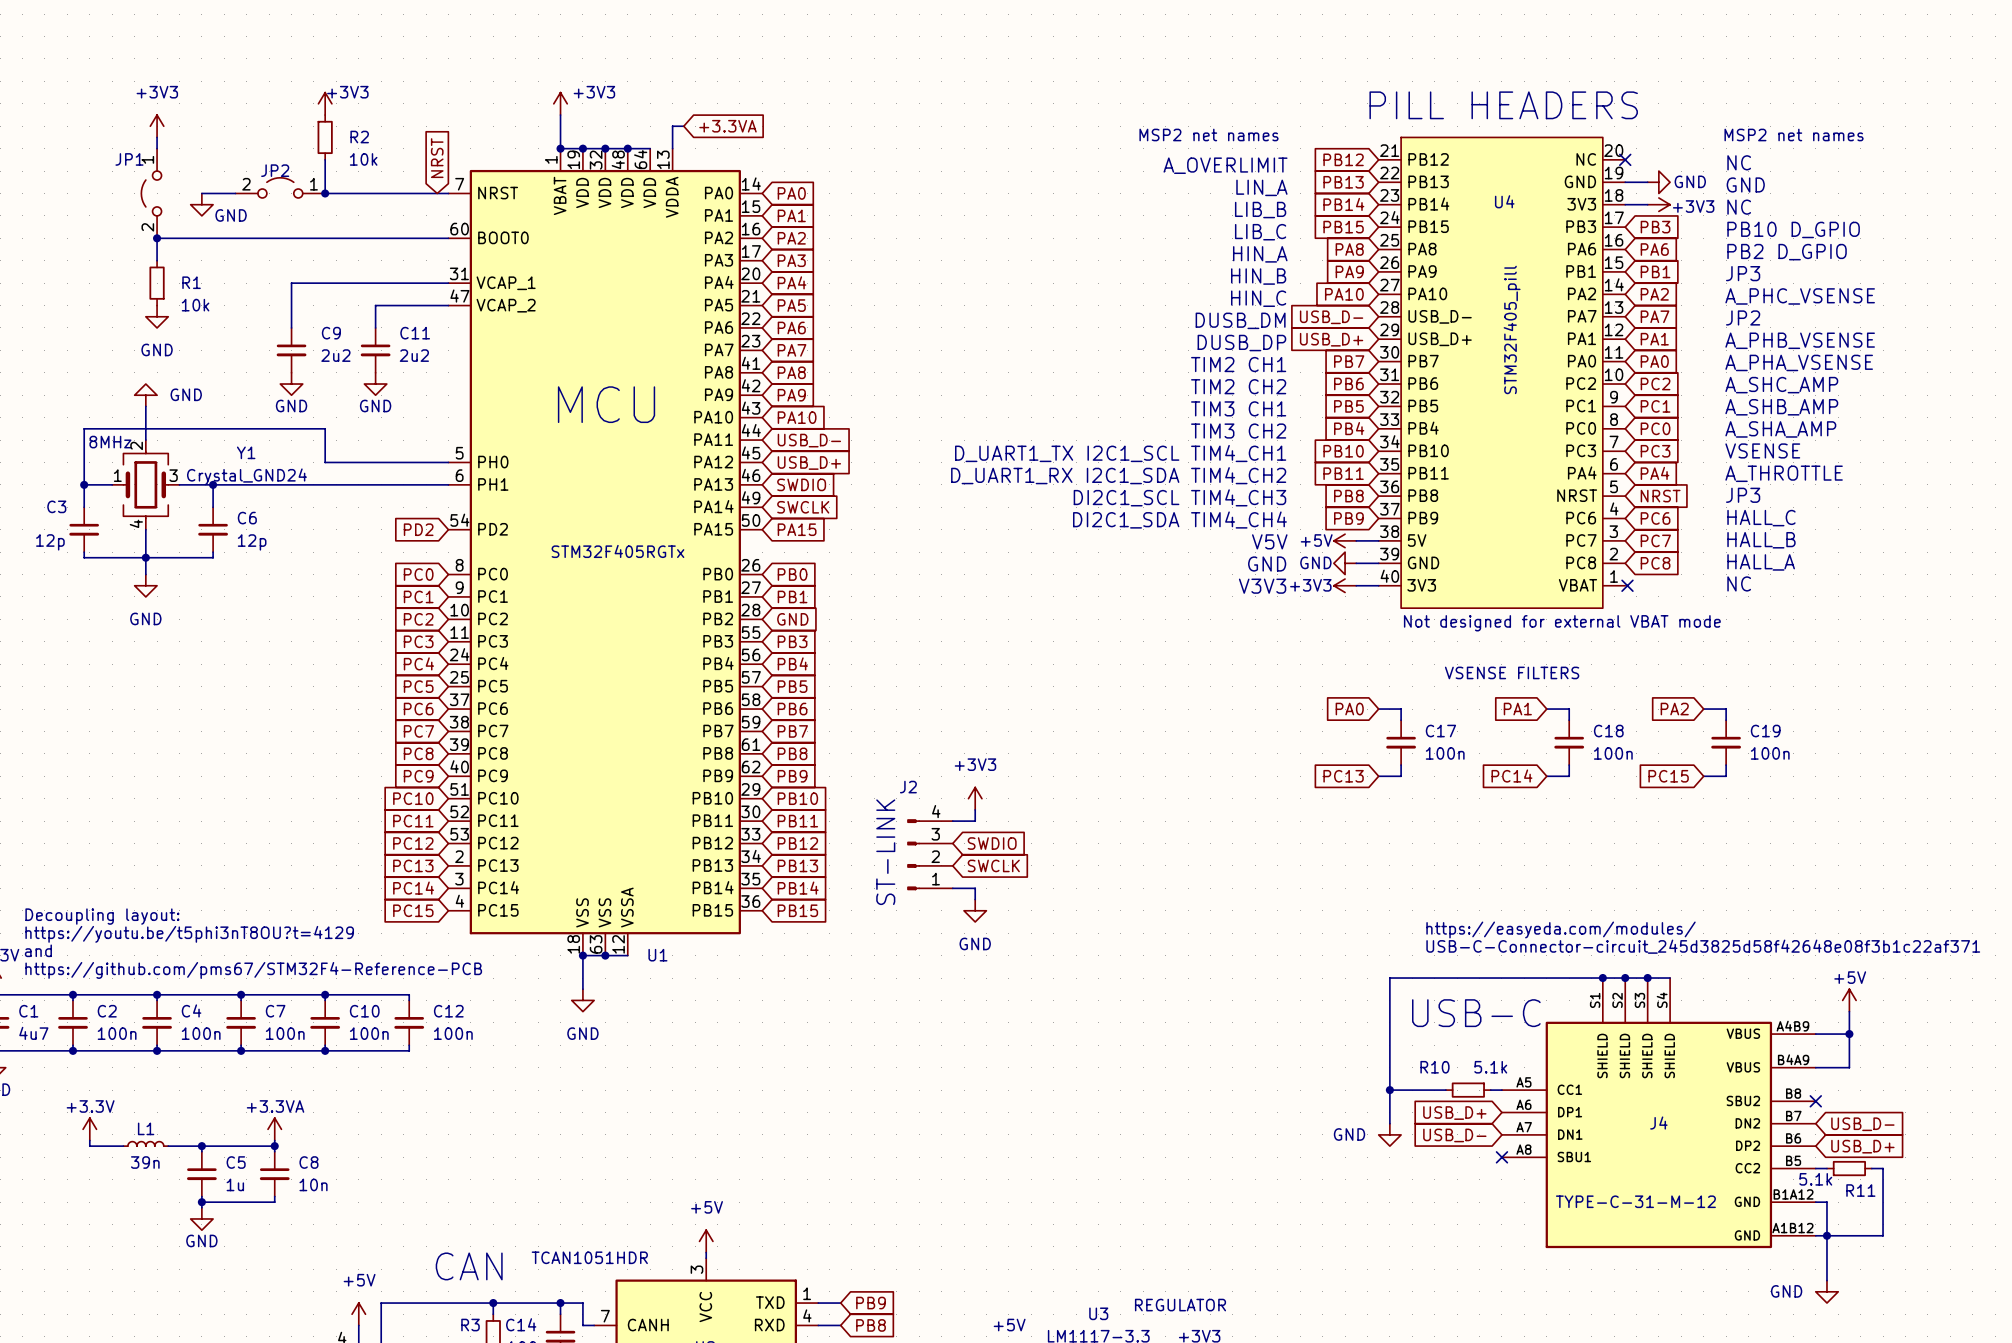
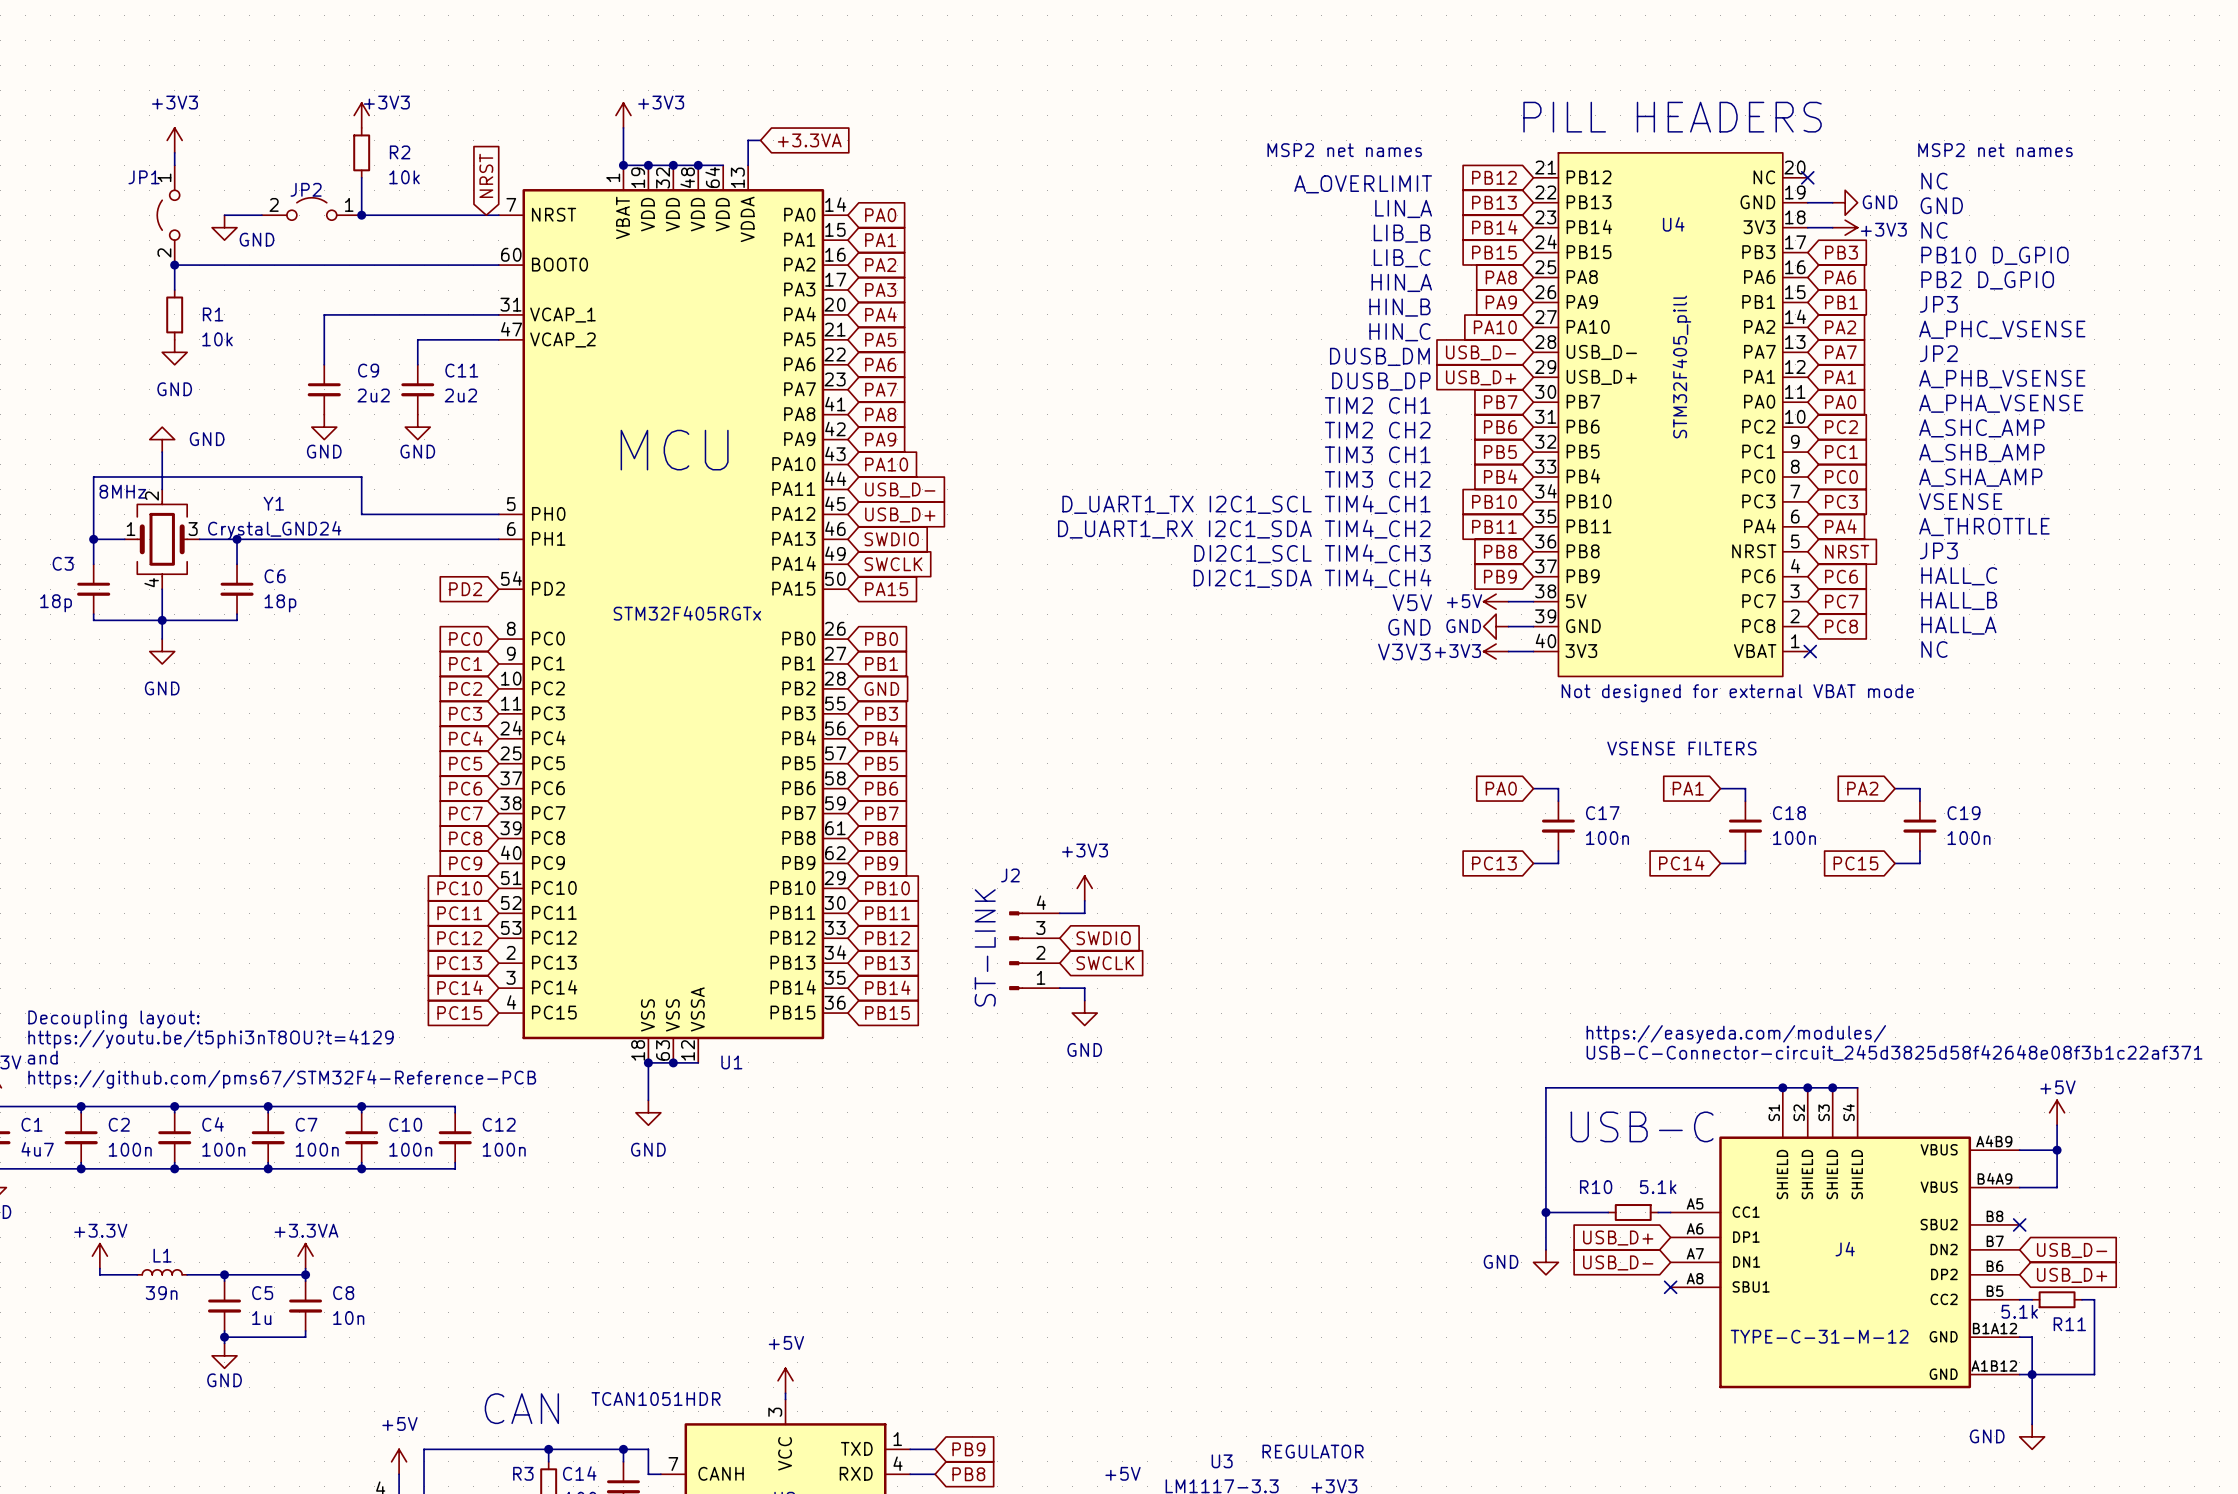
C3 value: 12p (50, 542) -> 18p (56, 603)
C6 value: 12p (252, 542) -> 18p (280, 603)

